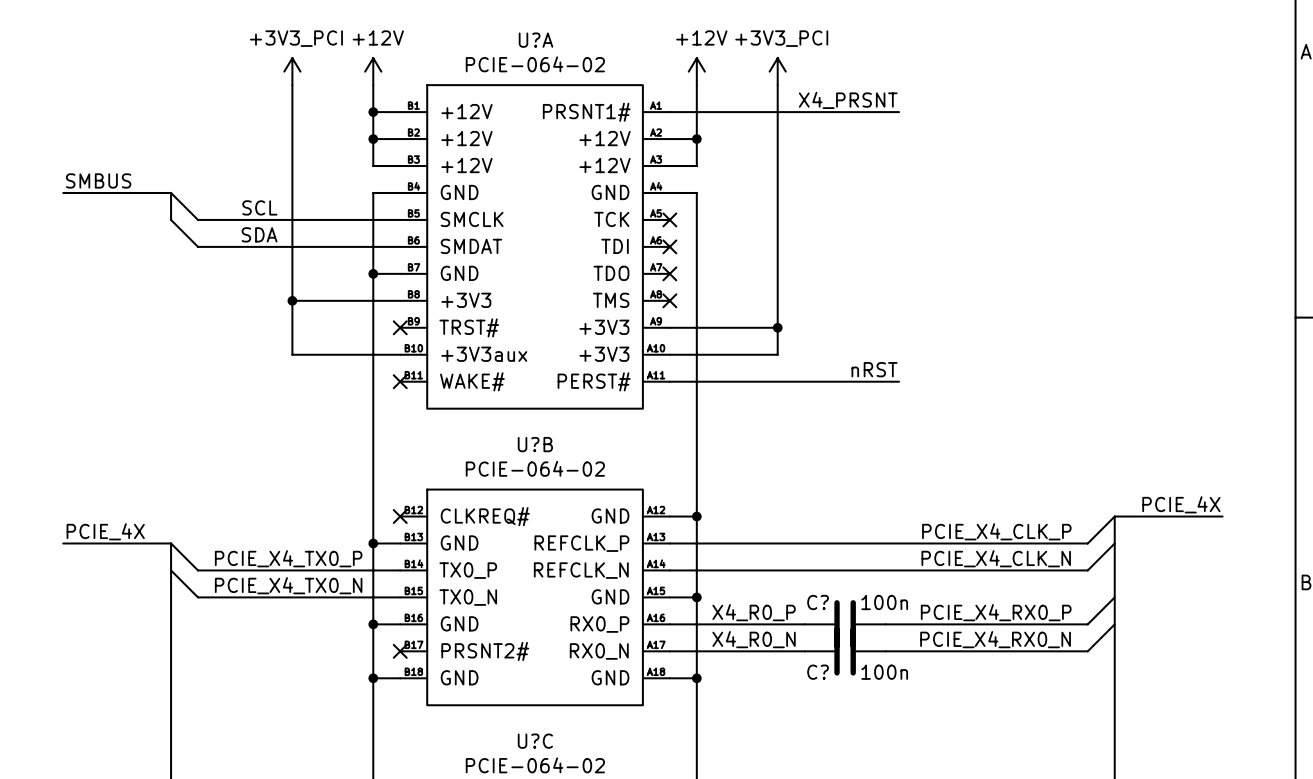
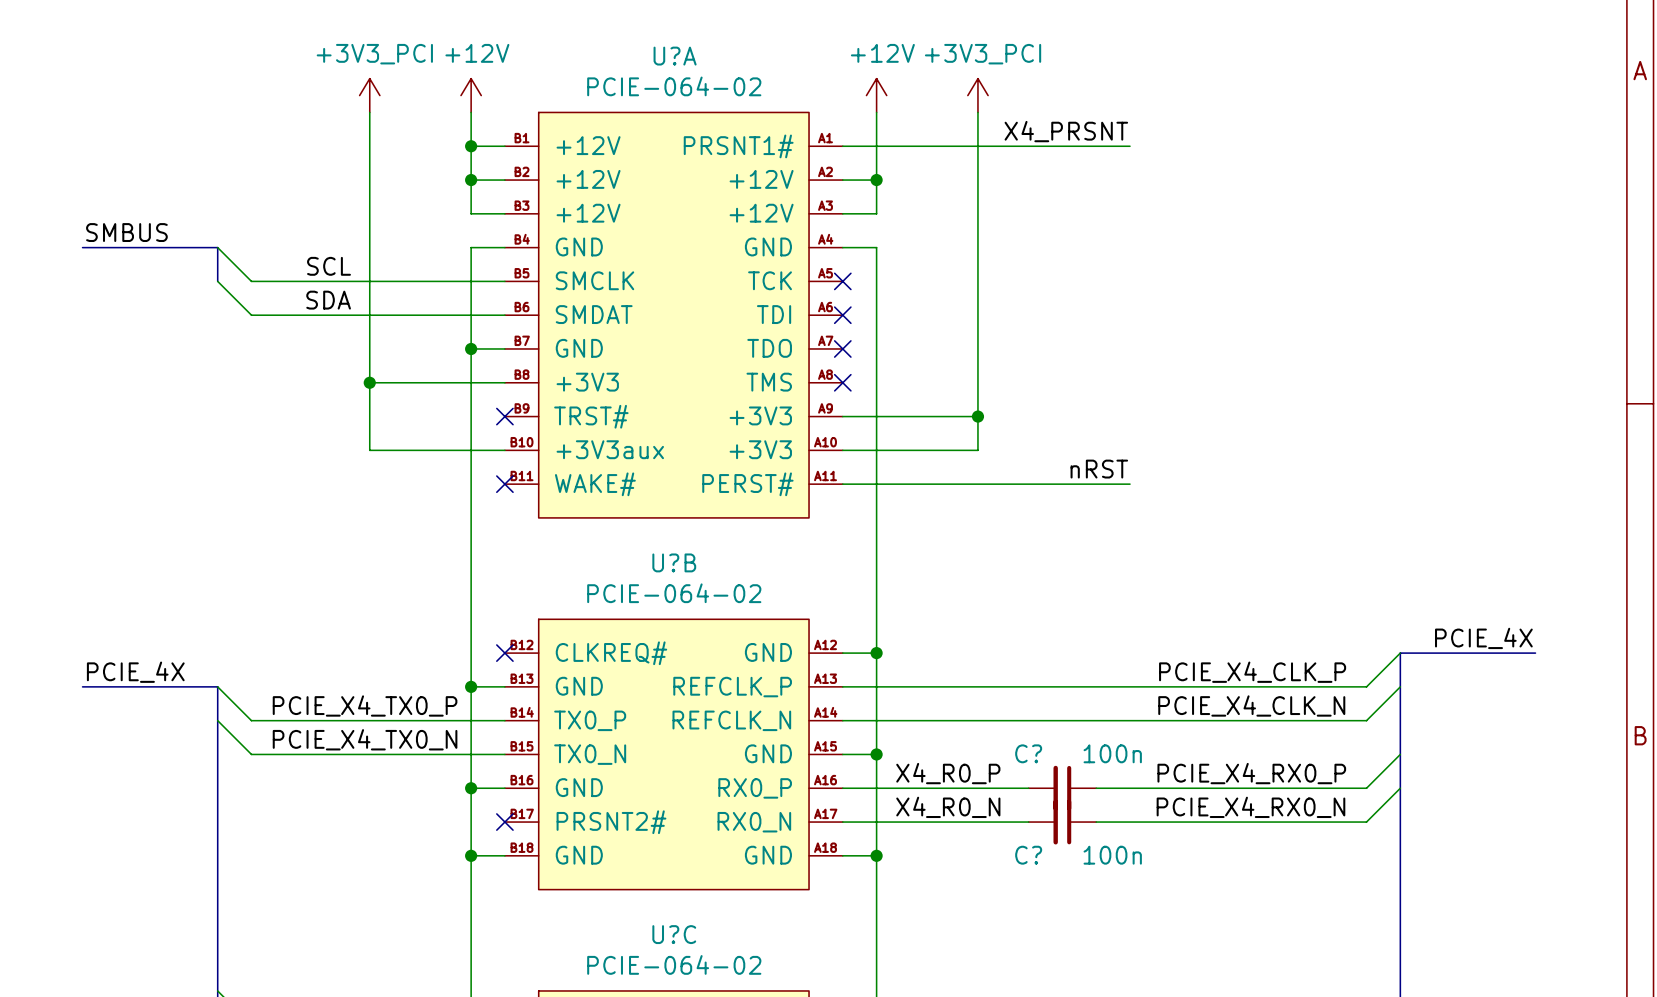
C? symbol: [804, 600, 886, 649] -> [1028, 765, 1097, 811]
C? symbol: [804, 627, 886, 676] -> [1028, 799, 1097, 845]

